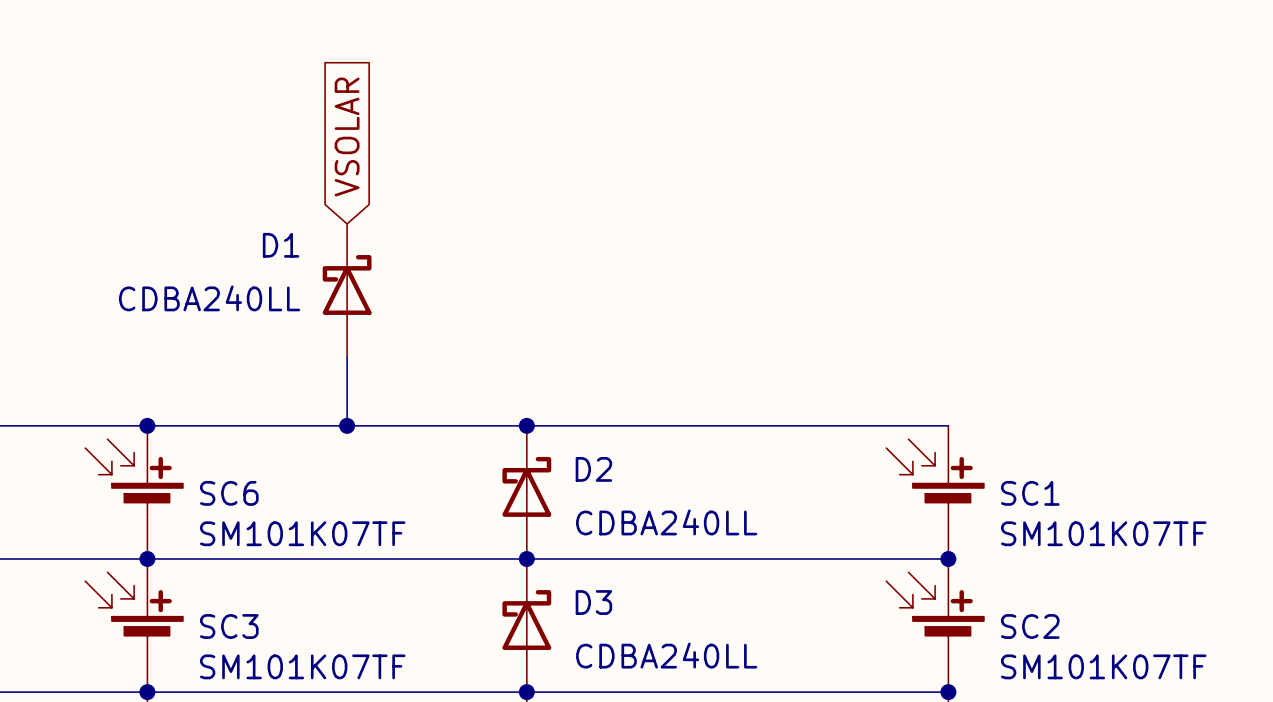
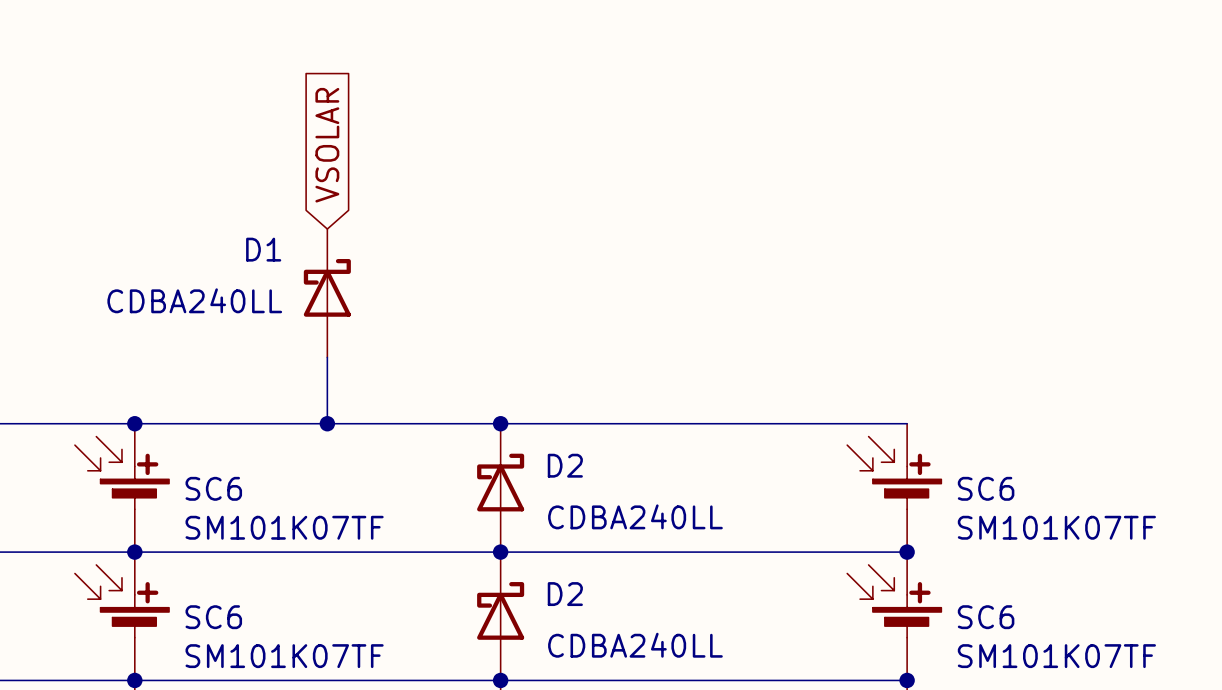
SC1 name: SC1 (1030, 493) -> SC6 (986, 488)
D3 name: D3 (593, 602) -> D2 (565, 594)
SC3 name: SC3 (229, 626) -> SC6 (213, 617)
SC2 name: SC2 (1030, 626) -> SC6 (986, 617)

